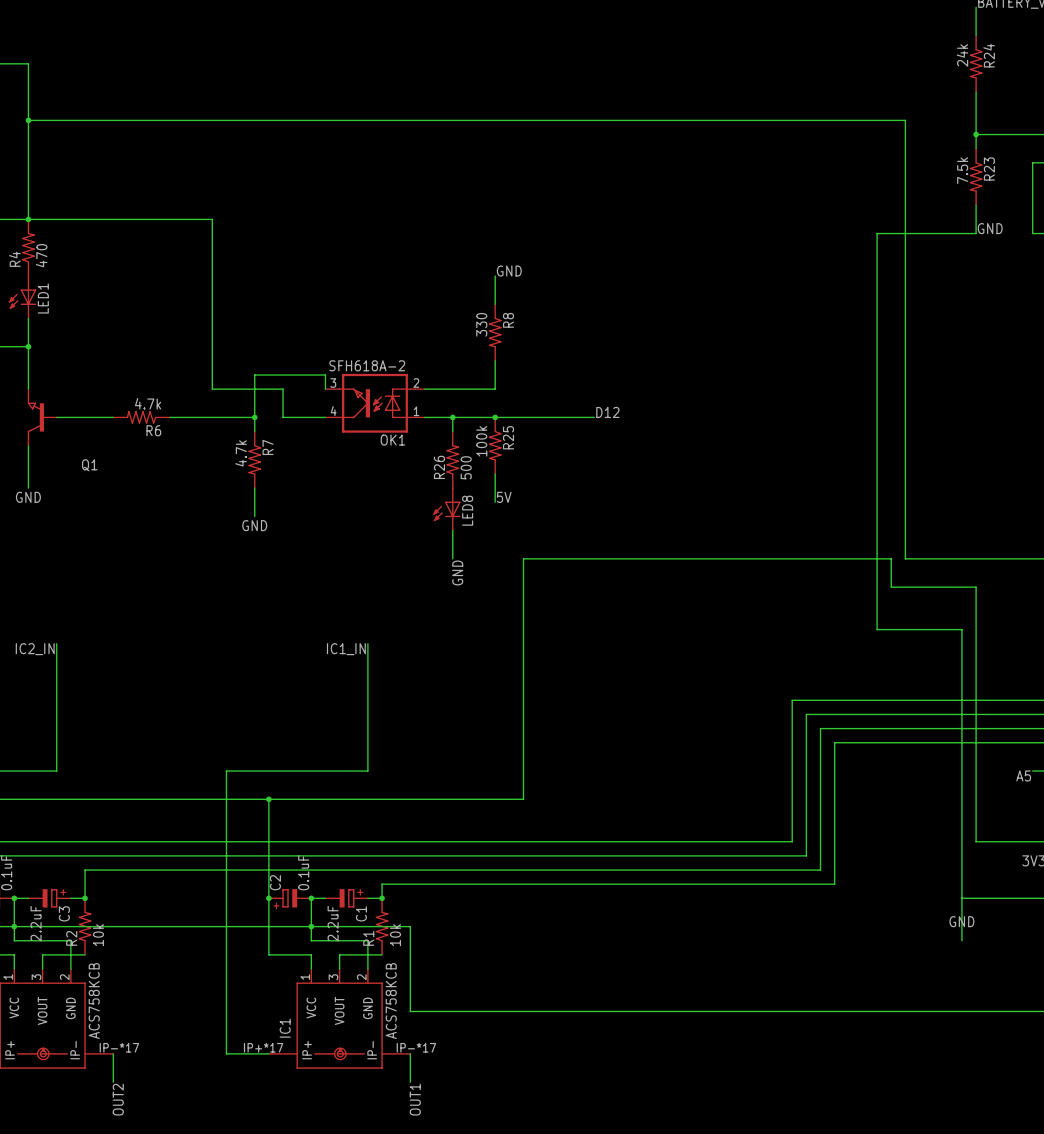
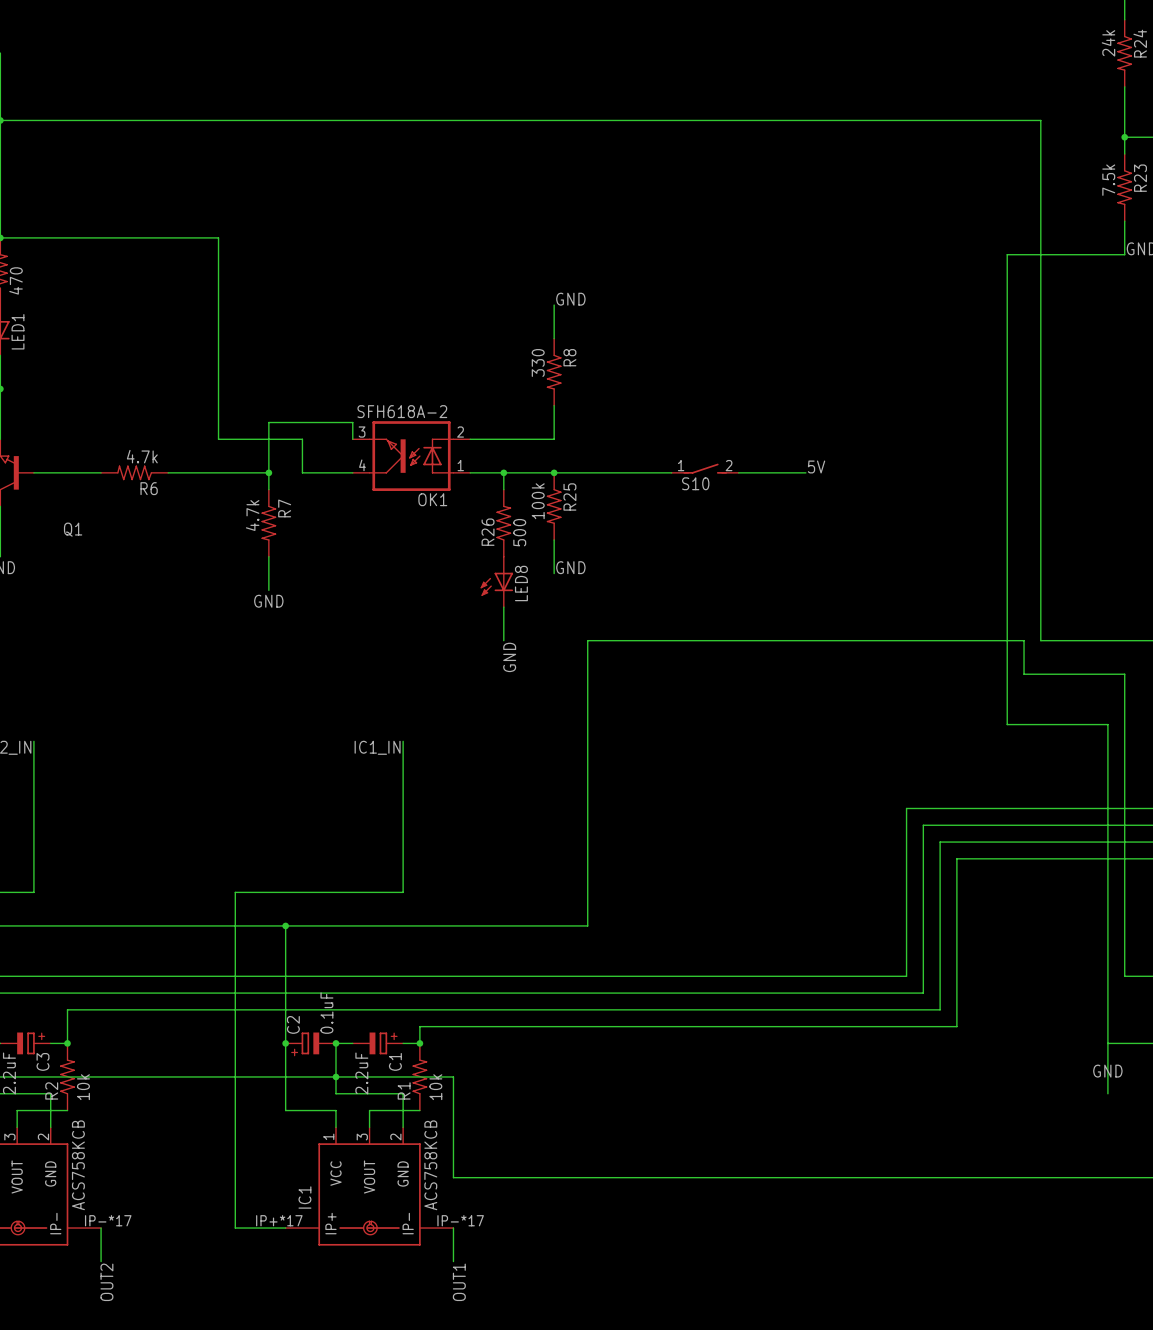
label: D12 (607, 412) -> none
label: none -> 5V (816, 466)
S10: none -> (705, 468)
wire: none -> (738, 472) (805, 472)
label: 5V (504, 497) -> GND (570, 567)

